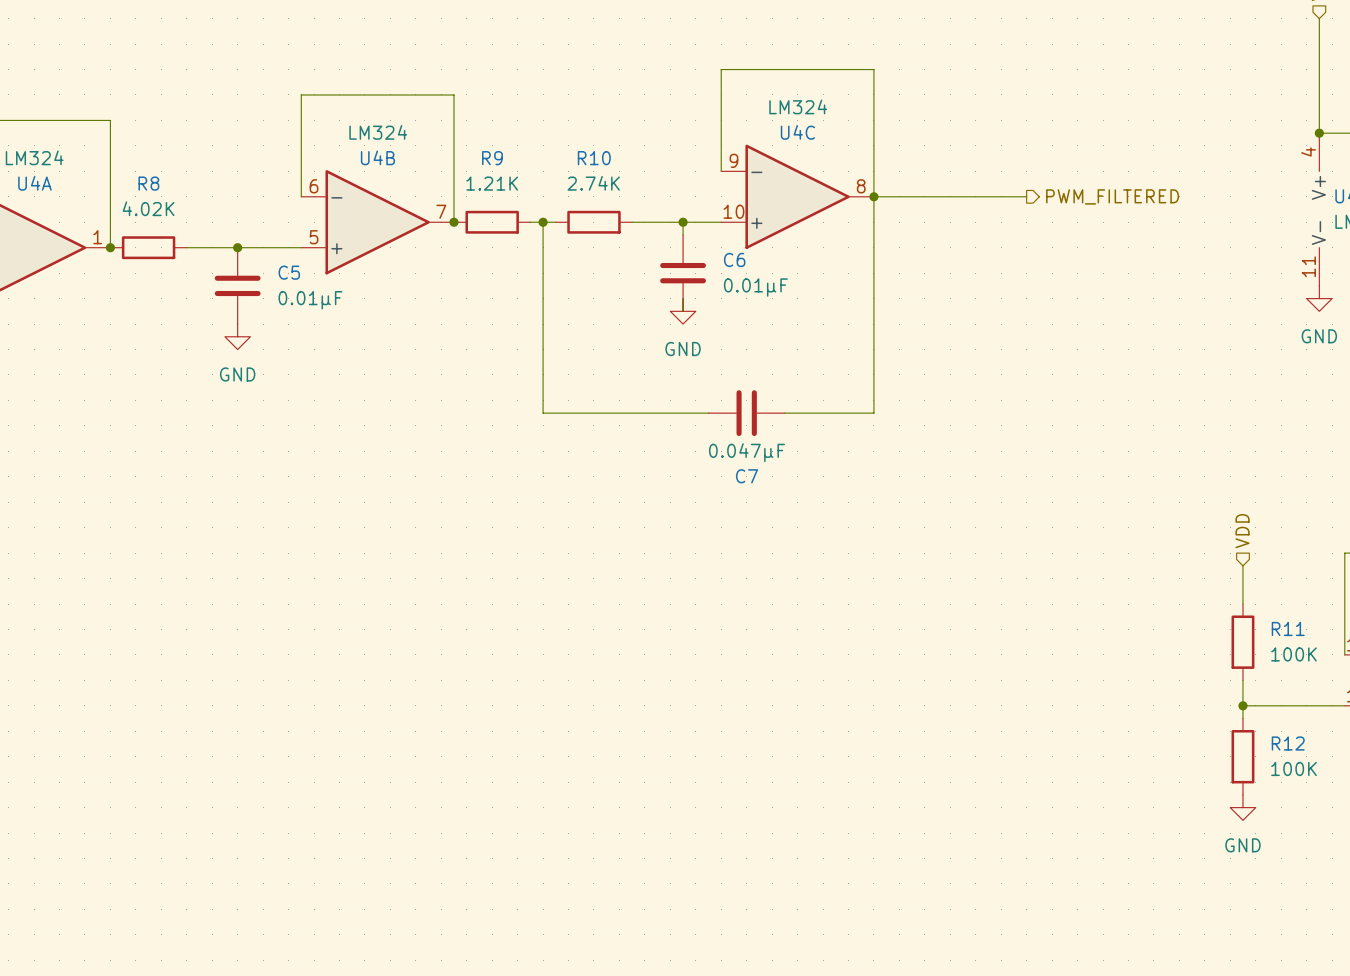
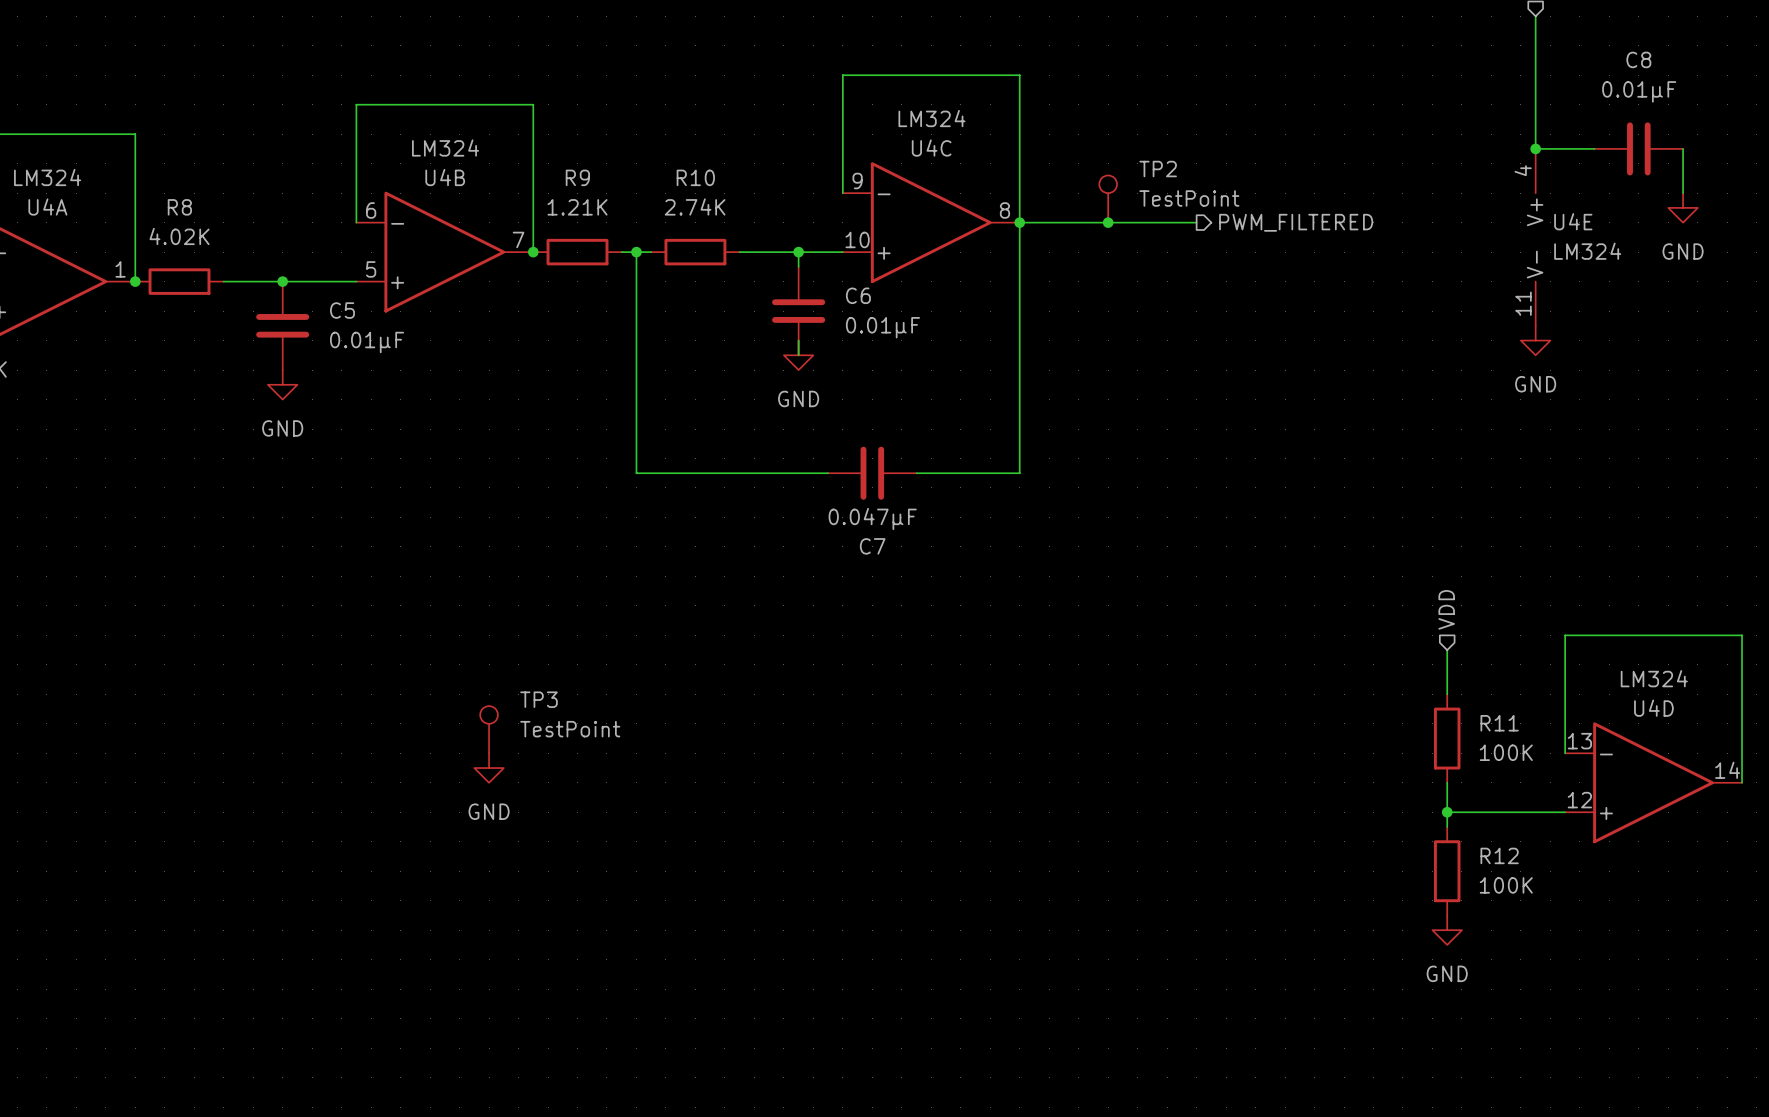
TP2: none -> TestPoint (1108, 199)
junction: none -> (1108, 222)
TP3: none -> TestPoint (489, 729)
power symbol: none -> GND (489, 768)

